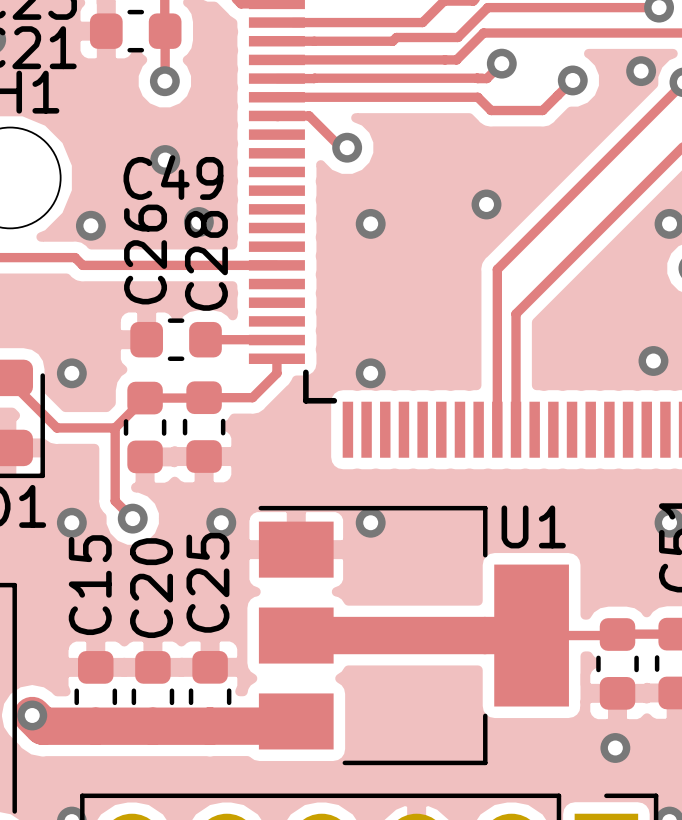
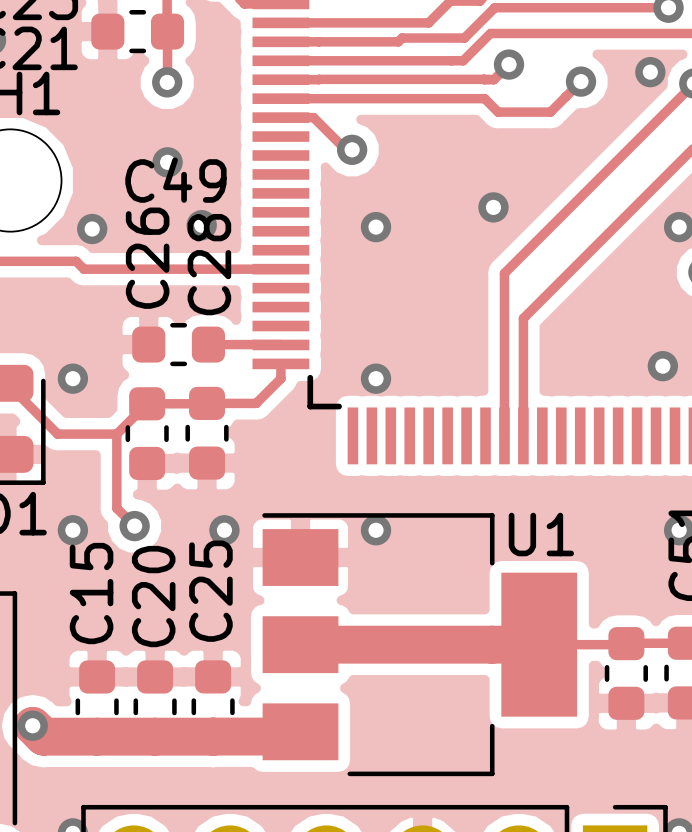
via: (615, 747) -> none

